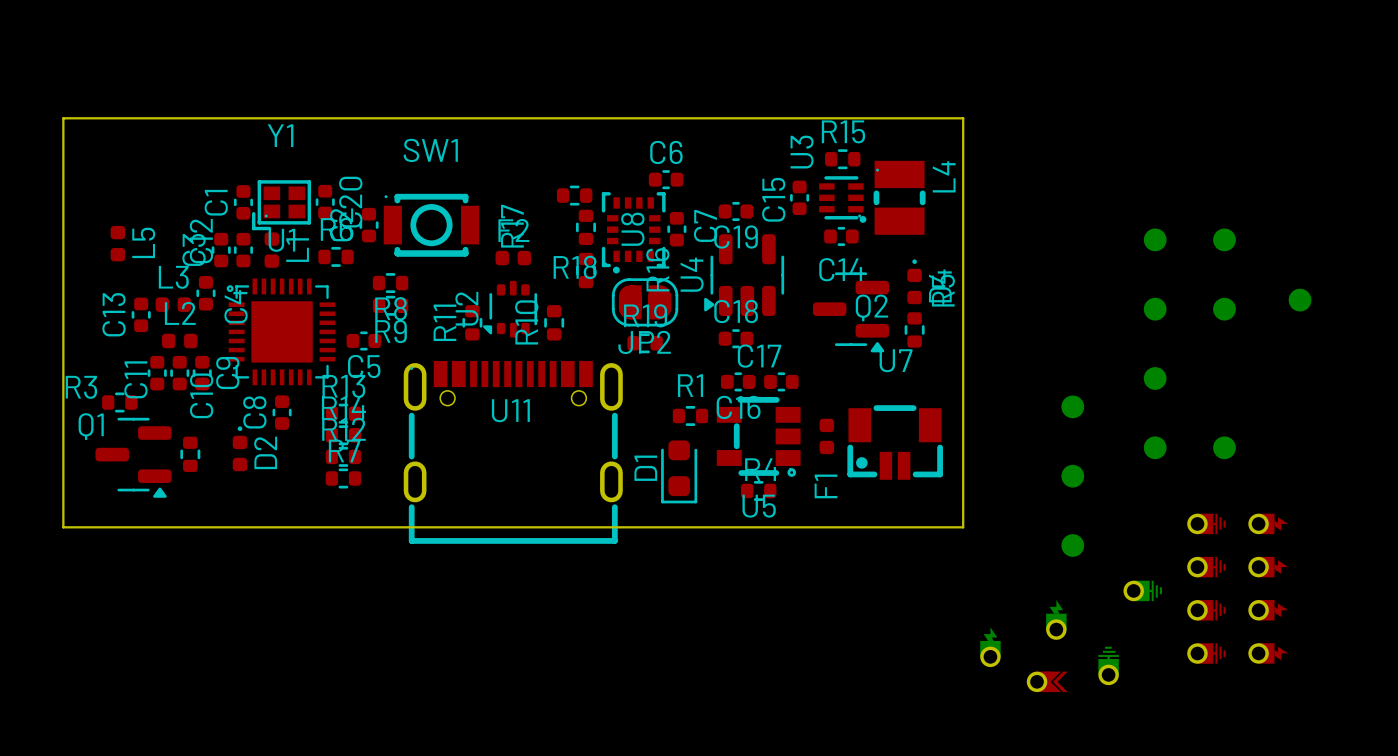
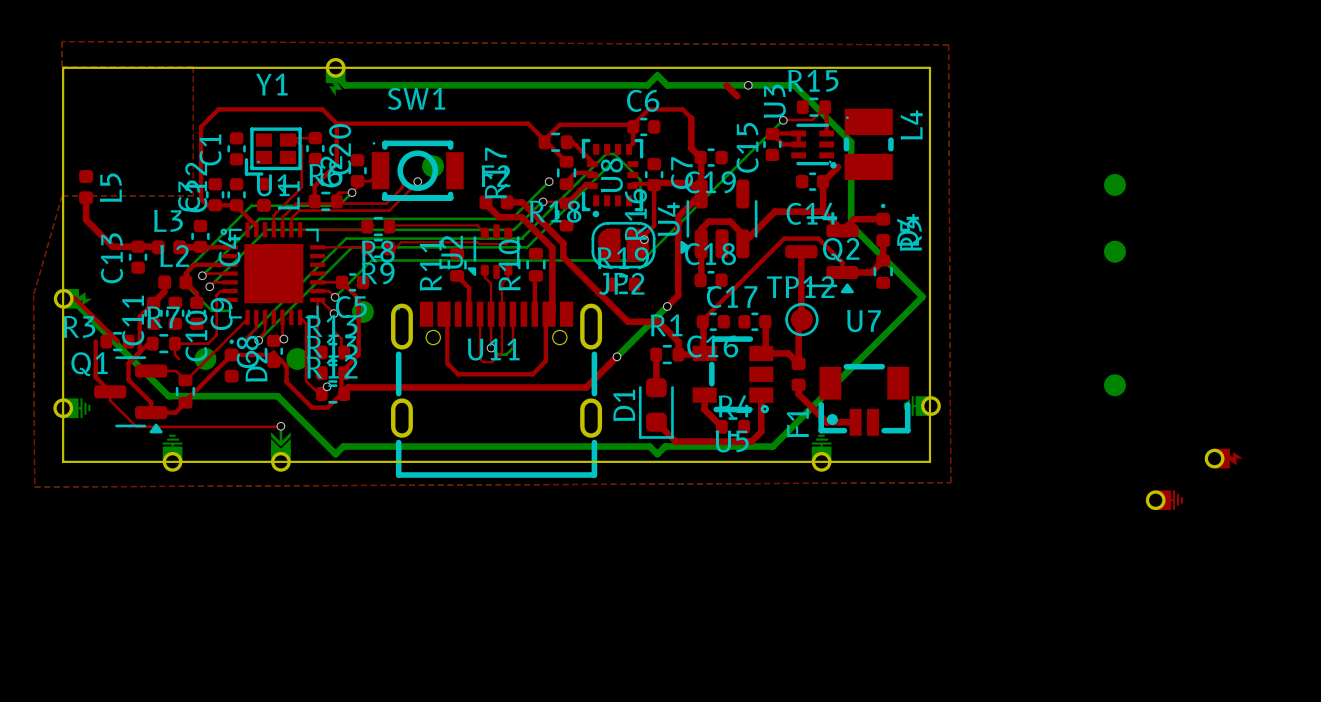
top zone outline: none -> (62, 41) (62, 66) (193, 66) (193, 195) (62, 195) (33, 295) (34, 487) (950, 482) (948, 44) (62, 41)
bottom track: none -> (335, 75) (345, 85) (647, 85) (657, 75) (667, 85) (794, 85) (851, 142) (851, 225) (922, 297) (772, 446) (665, 446) (657, 454) (649, 446) (343, 446) (335, 454) (277, 396) (168, 396) (71, 298)
part: none -> (335, 77)
top track: none -> (726, 85) (737, 96)
via: none -> (748, 85)
top track: none -> (783, 120) (812, 119) (825, 107) (826, 133)
bottom track: none -> (783, 120) (642, 260) (371, 260) (335, 297)
via: none -> (783, 120)
top track: none -> (336, 123) (528, 123) (563, 159) (566, 159)
top track: none -> (336, 123) (322, 109) (218, 109) (201, 126) (201, 199) (207, 205) (236, 205) (256, 225) (256, 229)
top track: none -> (336, 123) (336, 164) (314, 186) (314, 194)
top track: none -> (633, 124) (633, 142) (628, 147)
top track: none -> (633, 124) (559, 124) (544, 140)
top track: none -> (633, 124) (648, 109) (682, 109) (691, 118) (691, 148) (701, 158) (701, 193)
top track: none -> (772, 133) (782, 144) (798, 144) (798, 133) (772, 133)
top track: none -> (315, 138) (290, 138) (288, 140) (295, 140) (301, 146) (301, 187) (273, 215) (273, 229)
top track: none -> (566, 140) (570, 140) (592, 161)
bottom track: none -> (610, 164) (527, 247) (352, 247) (258, 340)
part: none -> (433, 166)
top track: none -> (838, 166) (823, 181)
top track: none -> (380, 170) (370, 181) (357, 181) (358, 186) (352, 192) (339, 192) (336, 194)
top track: none -> (592, 172) (575, 172) (566, 181)
top track: none -> (402, 181) (402, 187) (386, 203) (296, 203) (282, 217) (282, 229)
top track: none -> (417, 181) (389, 210) (299, 210) (291, 218) (291, 229)
via: none -> (417, 181)
bottom track: none -> (549, 181) (511, 218) (259, 218) (202, 275)
via: none -> (549, 181)
top track: none -> (823, 181) (823, 211)
top track: none -> (654, 182) (632, 183)
top track: none -> (654, 182) (654, 225) (639, 239)
top track: none -> (654, 182) (690, 182) (701, 193)
top track: none -> (592, 183) (586, 183) (569, 201) (543, 201)
part: (1224, 239) -> none
L5 position: (117, 243) -> (86, 187)
bottom track: none -> (352, 192) (338, 205) (251, 205) (187, 269) (187, 286) (211, 310) (229, 310)
via: none -> (352, 192)
top track: none -> (701, 193) (678, 216) (678, 295) (667, 306)
top track: none -> (86, 197) (86, 219) (112, 246) (158, 247)
bottom track: none -> (543, 201) (514, 229) (266, 229) (209, 286)
via: none -> (543, 201)
top track: none -> (485, 202) (499, 217) (521, 217) (552, 247) (552, 314)
top track: none -> (507, 202) (522, 202) (563, 243) (563, 257) (627, 321) (658, 321) (678, 341) (678, 354) (704, 353) (702, 320) (784, 238) (818, 238) (842, 262) (842, 272) (871, 272) (883, 260) (883, 240)
bottom track: none -> (640, 210) (640, 179) (614, 154) (606, 154) (522, 238) (346, 238) (245, 339)
top track: none -> (823, 211) (774, 211) (742, 243) (742, 234) (729, 221) (708, 221) (701, 229) (700, 280)
top track: none -> (823, 211) (842, 230) (854, 219) (883, 219)
top track: none -> (373, 225) (369, 229) (300, 229)
top track: none -> (396, 225) (477, 225) (484, 233)
top track: none -> (508, 233) (508, 242) (506, 244) (401, 242) (396, 247)
via: none -> (644, 239)
part: (1300, 300) -> none
top track: none -> (179, 247) (230, 247)
top track: none -> (317, 247) (373, 247)
top track: none -> (801, 251) (801, 313) (807, 319)
part: (1224, 309) -> none
top track: none -> (230, 264) (194, 264) (185, 273) (185, 282) (196, 293) (196, 302)
top track: none -> (484, 270) (484, 277) (491, 283) (491, 348)
top track: none -> (508, 270) (508, 277) (502, 283) (502, 352) (492, 362) (483, 362) (480, 358) (480, 314)
top track: none -> (230, 273) (204, 273) (202, 275)
via: none -> (202, 275)
top track: none -> (457, 276) (469, 288) (469, 314)
top track: none -> (535, 276) (534, 314)
top track: none -> (230, 282) (214, 282) (209, 286)
top track: none -> (317, 282) (342, 282) (358, 298) (358, 354) (341, 372) (341, 394)
via: none -> (209, 286)
top track: none -> (164, 291) (139, 316) (139, 352)
top track: none -> (230, 291) (220, 291) (216, 295) (216, 335) (208, 343) (174, 343) (174, 354) (179, 358)
top track: none -> (317, 291) (328, 291) (335, 297)
via: none -> (335, 297)
top track: none -> (69, 298) (75, 298) (118, 341)
part: none -> (72, 298)
bottom track: none -> (667, 306) (616, 356)
via: none -> (667, 306)
part: none -> (363, 311)
top track: none -> (334, 313) (320, 299) (317, 299) (317, 348)
via: none -> (334, 313)
top track: none -> (440, 314) (447, 314) (447, 363) (458, 374) (532, 374) (545, 361) (545, 314)
top track: none -> (512, 314) (512, 348)
top track: none -> (247, 317) (186, 380) (176, 371) (151, 371)
top track: none -> (256, 317) (256, 328) (245, 339)
top track: none -> (265, 317) (265, 331) (258, 340)
top track: none -> (282, 317) (283, 339)
top track: none -> (300, 317) (306, 323) (306, 381) (319, 394) (327, 386)
TP12 side: bottom (1155, 378) -> top (801, 319)
top track: none -> (801, 319) (798, 322) (798, 363) (788, 353) (761, 353) (765, 348) (765, 321)
top track: none -> (334, 331) (341, 338) (341, 350)
via: none -> (283, 339)
via: none -> (258, 340)
top track: none -> (95, 341) (95, 377) (110, 391) (110, 400) (136, 426) (280, 426)
top track: none -> (148, 343) (128, 363) (128, 379) (151, 402) (151, 412) (175, 412) (231, 354) (271, 354) (273, 352)
part: (1072, 406) -> none
R14 name: R14 (343, 407) -> R13 (332, 346)
bottom track: none -> (491, 348) (497, 354) (506, 354) (512, 348)
via: none -> (491, 348)
top track: none -> (273, 353) (286, 366)
top track: none -> (656, 354) (656, 387)
top track: none -> (616, 356) (586, 387) (347, 387) (341, 394)
via: none -> (616, 356)
part: none -> (205, 358)
part: none -> (297, 358)
top track: none -> (286, 366) (286, 381)
U7 position: (895, 442) -> (864, 399)
top track: none -> (286, 381) (312, 407) (327, 407) (341, 394)
top track: none -> (798, 384) (798, 394) (826, 422) (855, 422)
part: (1224, 447) -> none
D2 position: (240, 448) -> (231, 361)
via: none -> (327, 386)
top track: none -> (704, 395) (704, 409) (721, 426)
top track: none -> (761, 395) (761, 431) (751, 441) (675, 441) (656, 422)
part: none -> (71, 408)
part: (1072, 476) -> none
R7 position: (343, 478) -> (163, 343)
bottom track: none -> (280, 426) (280, 442)
via: none -> (280, 426)
part: none -> (280, 452)
part: none -> (172, 453)
part side: top (1206, 523) -> bottom (922, 406)
part: (1072, 545) -> none
part: (1268, 567) -> none
part: (1142, 590) -> none
part: (1206, 610) -> none
part: (1268, 610) -> none
part: (1056, 619) -> none
part: (990, 647) -> none
part side: top (1206, 653) -> bottom (821, 453)
part: (1268, 653) -> none
part: (1108, 665) -> none
part: (1047, 681) -> none

